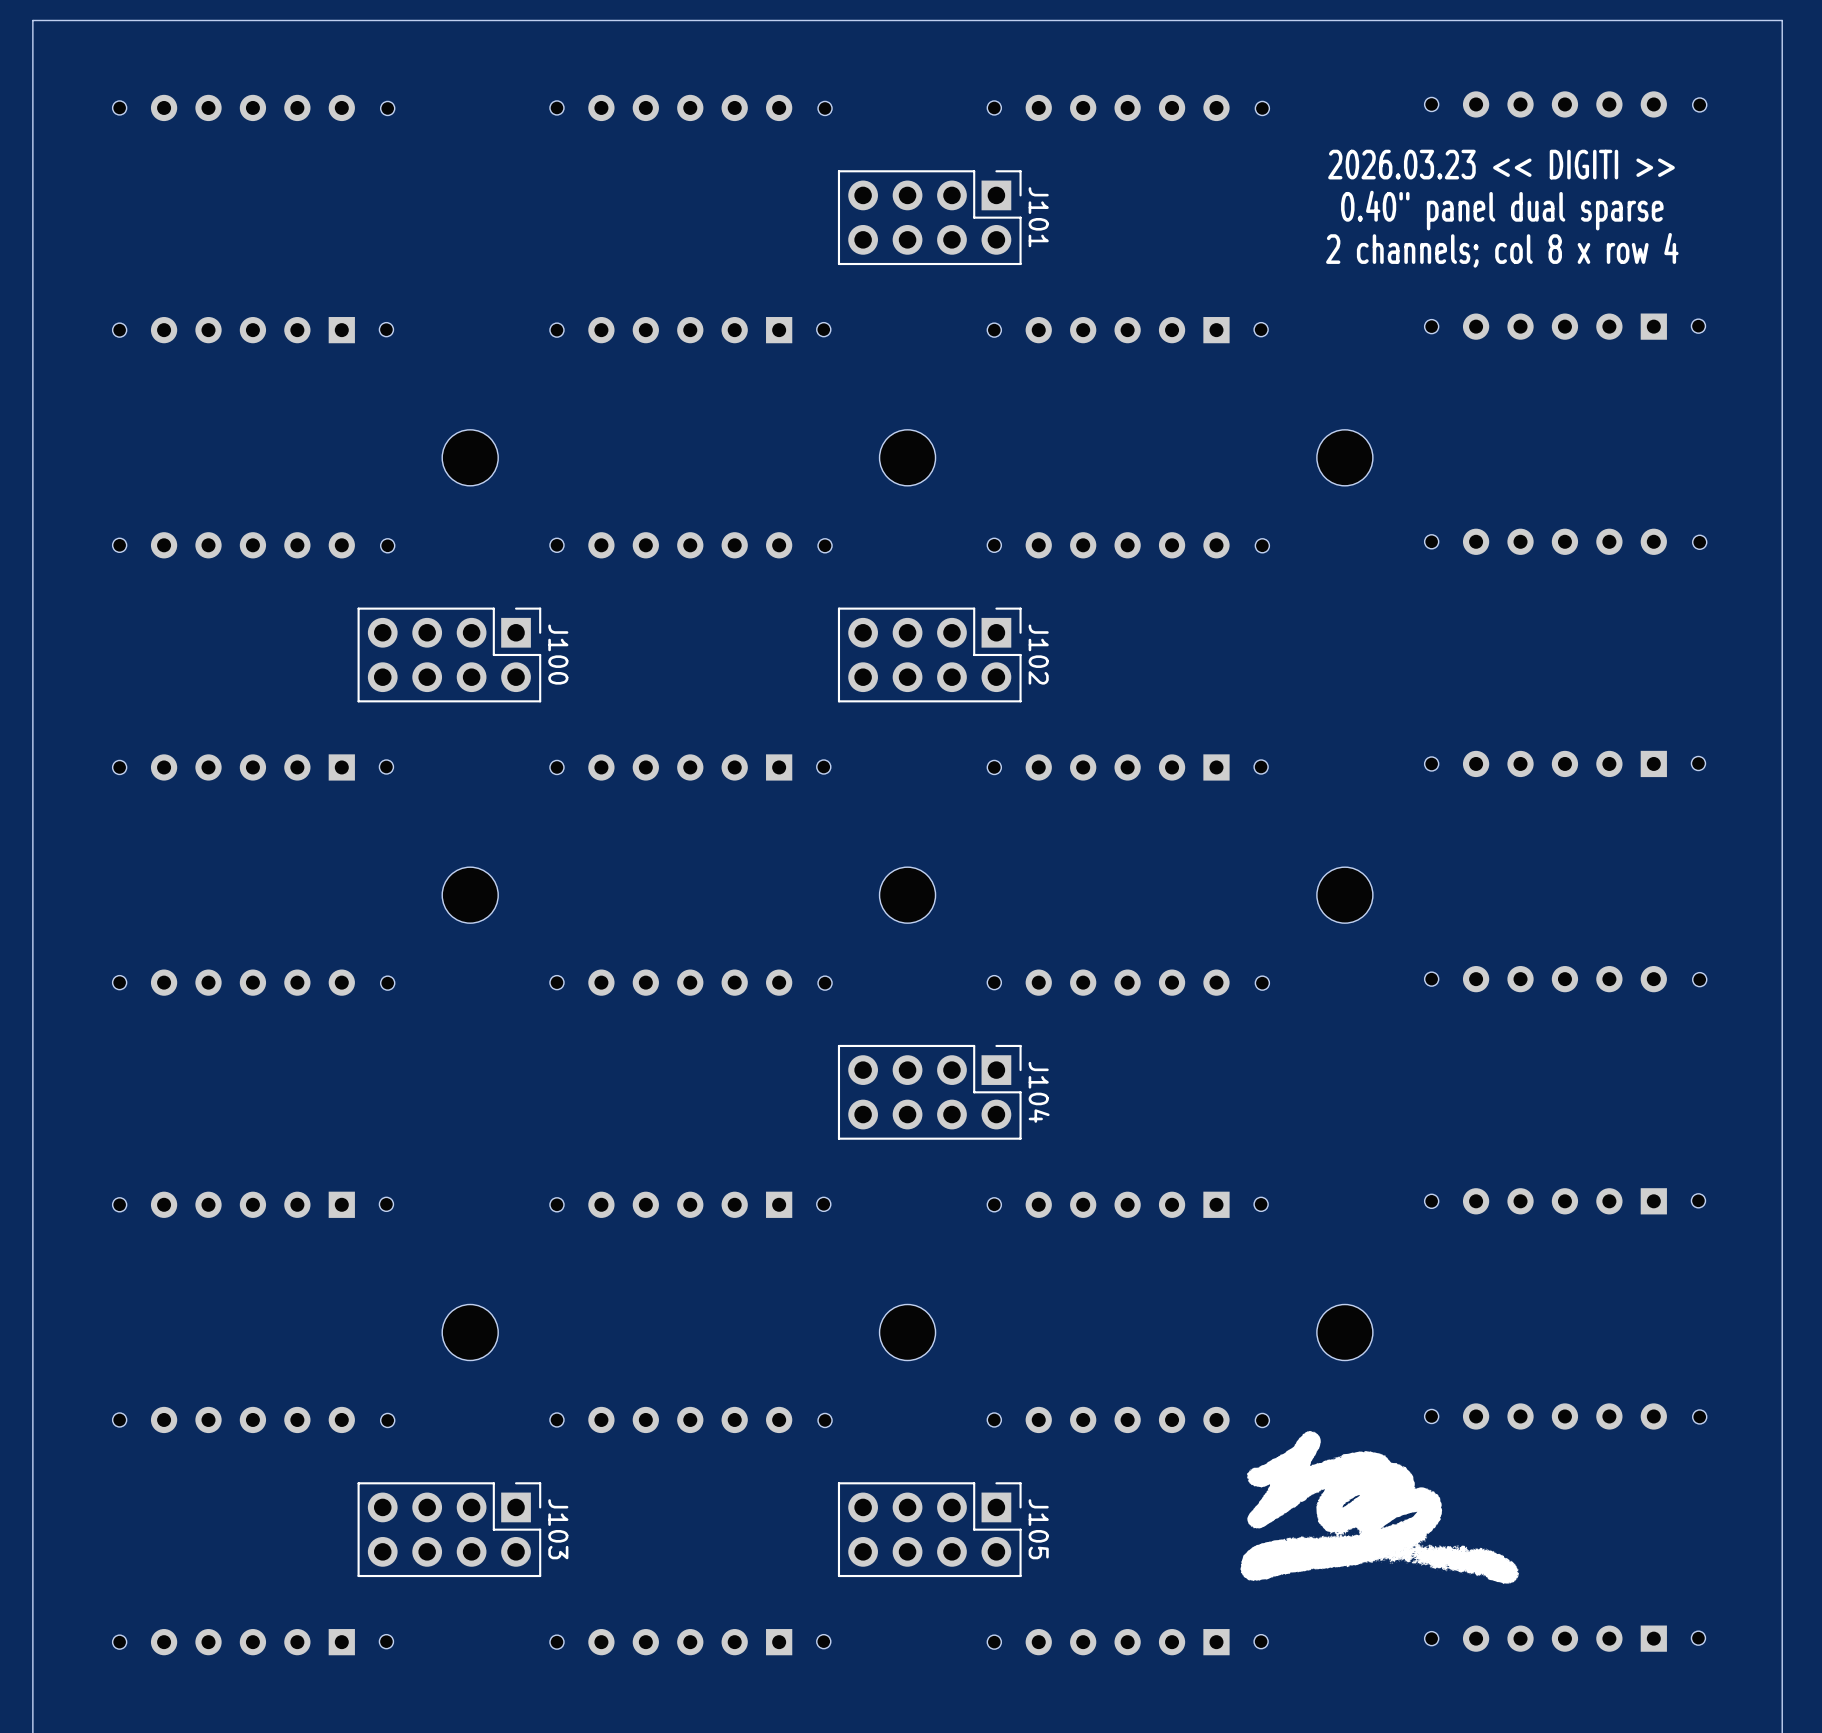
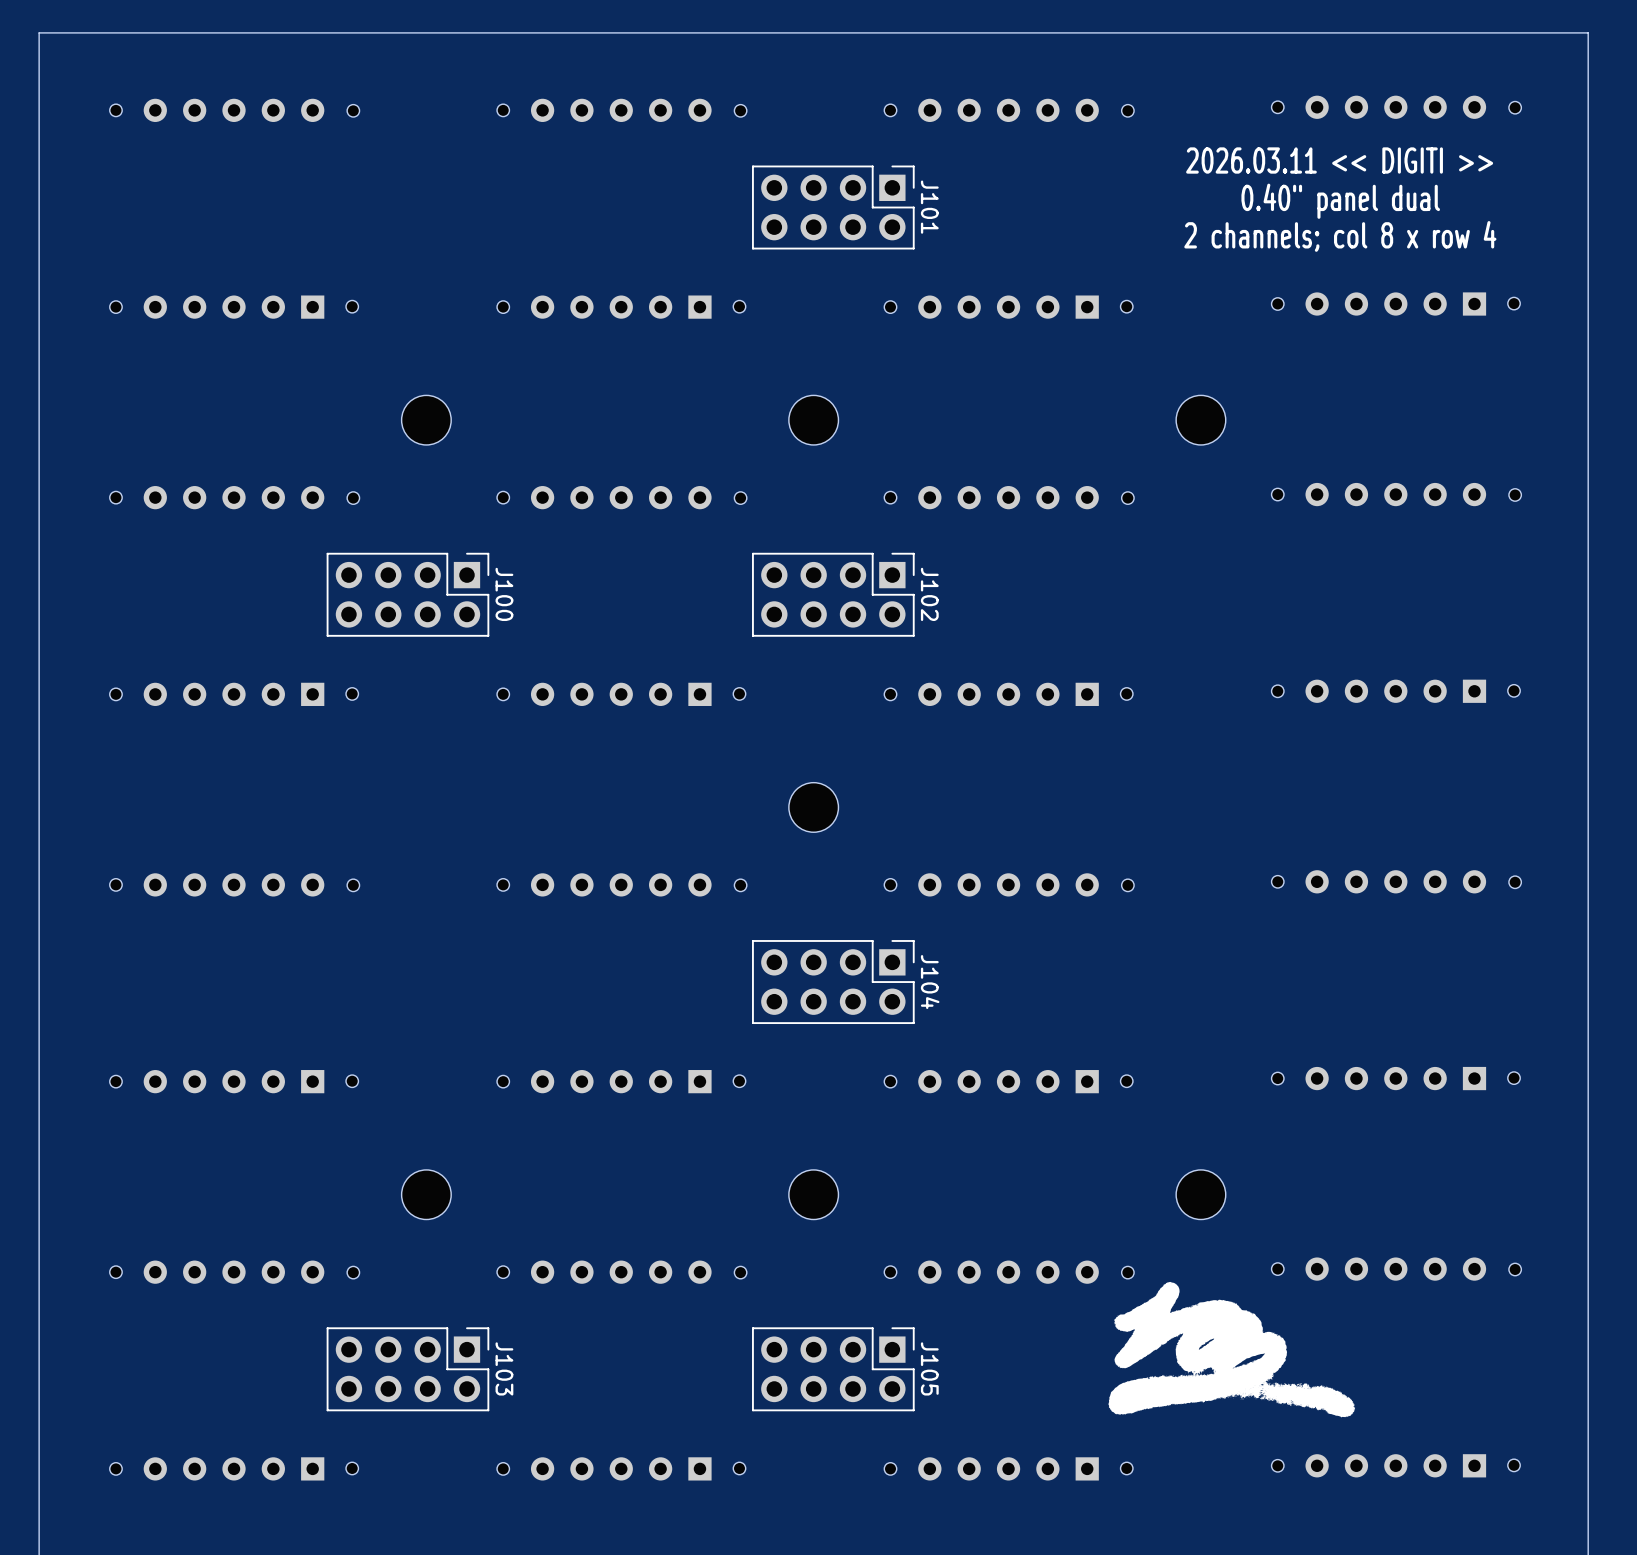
text: 2026.03.23 << DIGITI >> (1501, 164) -> 2026.03.11 << DIGITI >> (1339, 160)
text: 0.40" panel dual sparse (1502, 210) -> 0.40" panel dual (1340, 201)
part: (470, 895) -> none
part: (1344, 895) -> none

